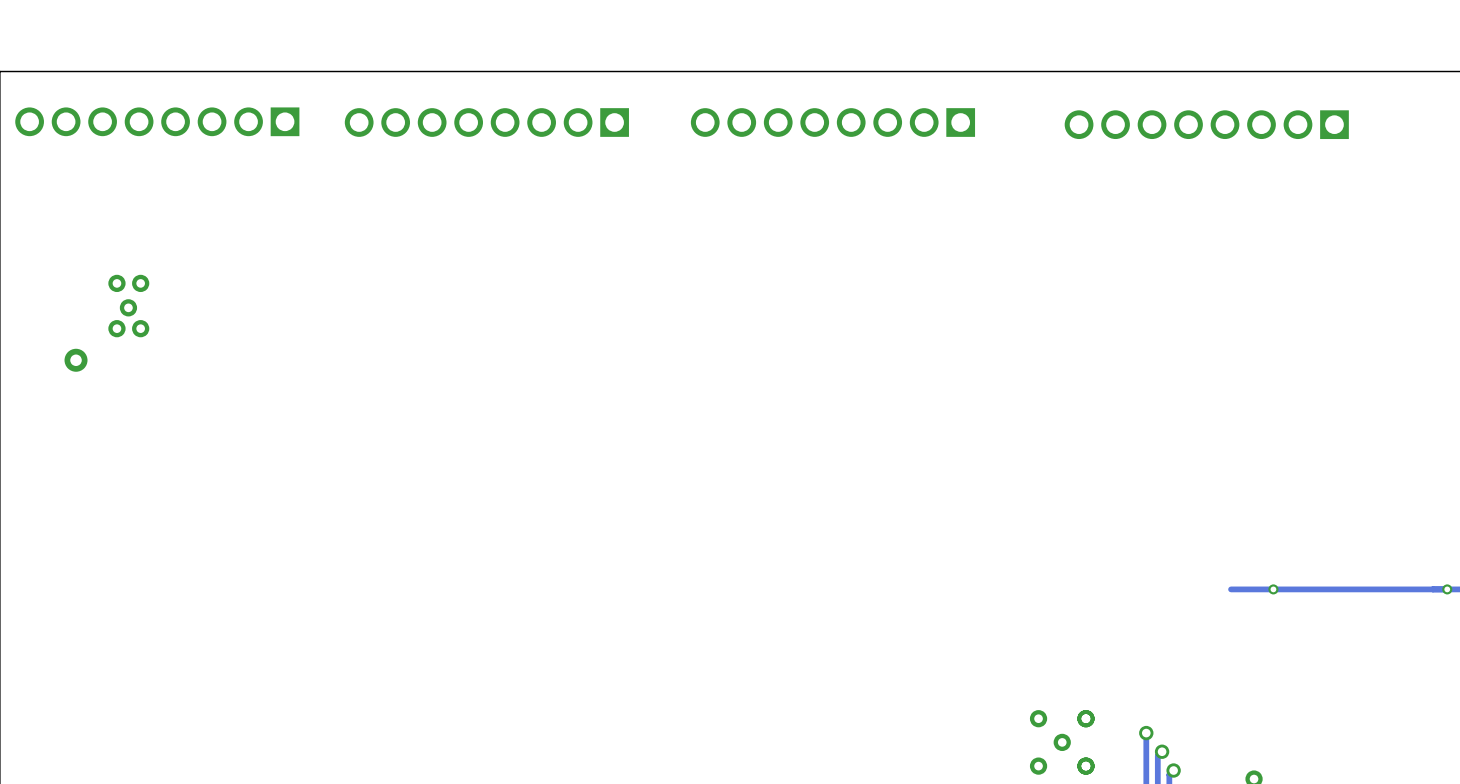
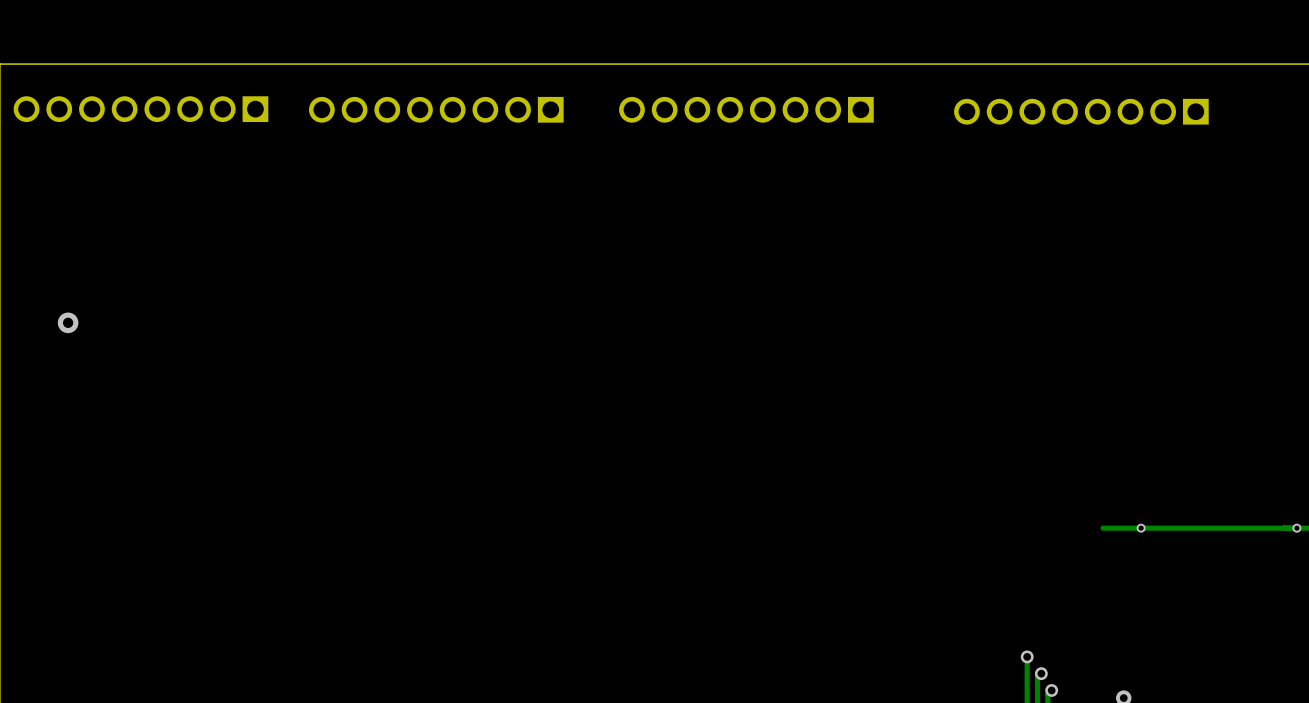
via: (116, 283) -> none
via: (140, 283) -> none
via: (128, 307) -> none
via: (116, 328) -> none
via: (140, 328) -> none
via: (1038, 718) -> none
via: (1085, 718) -> none
via: (1062, 742) -> none
via: (1038, 766) -> none
via: (1085, 766) -> none

